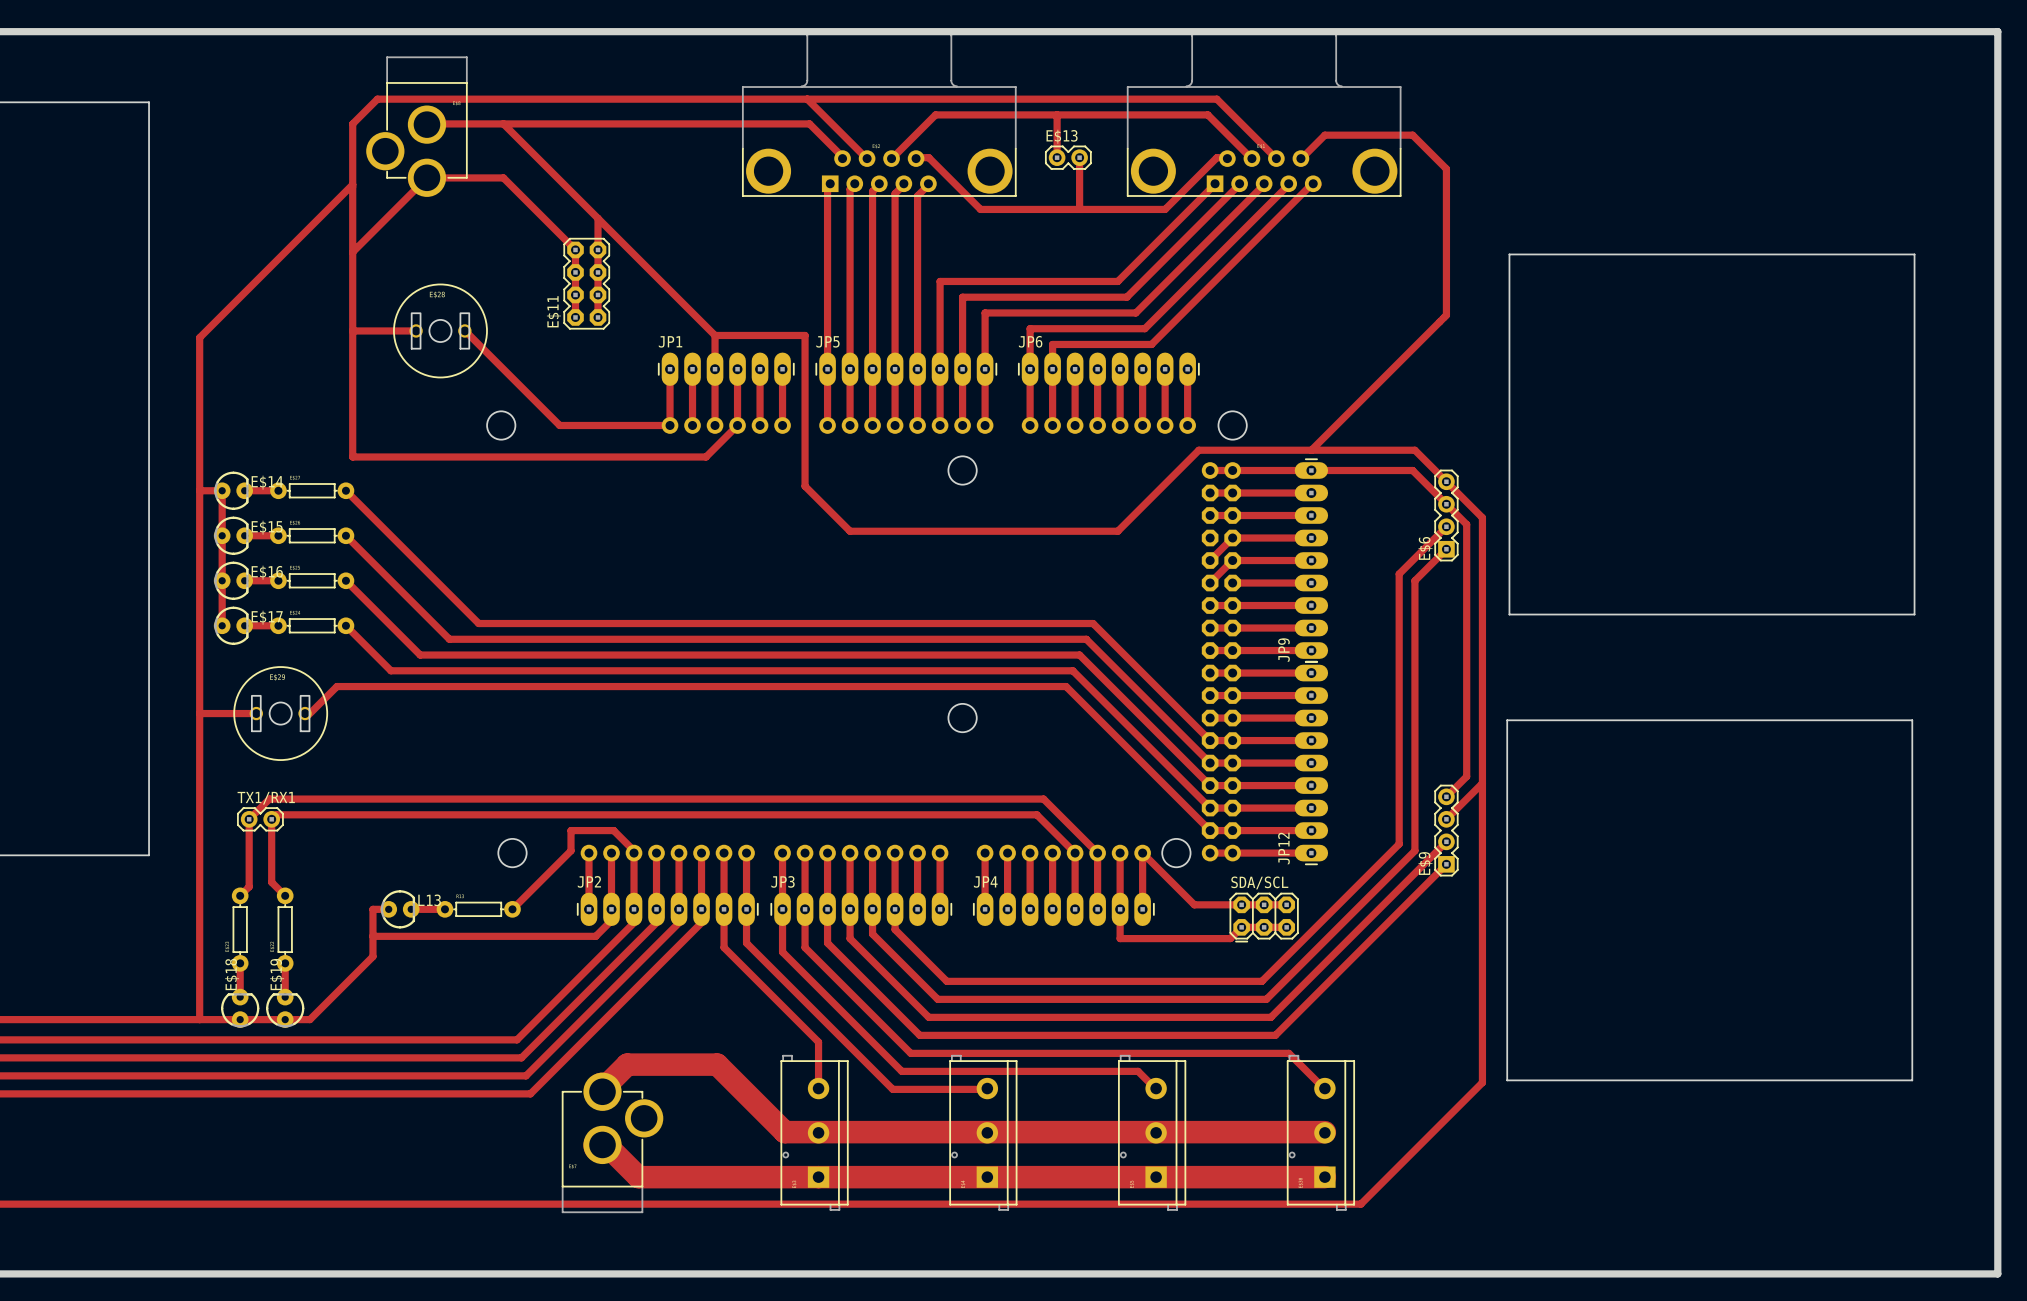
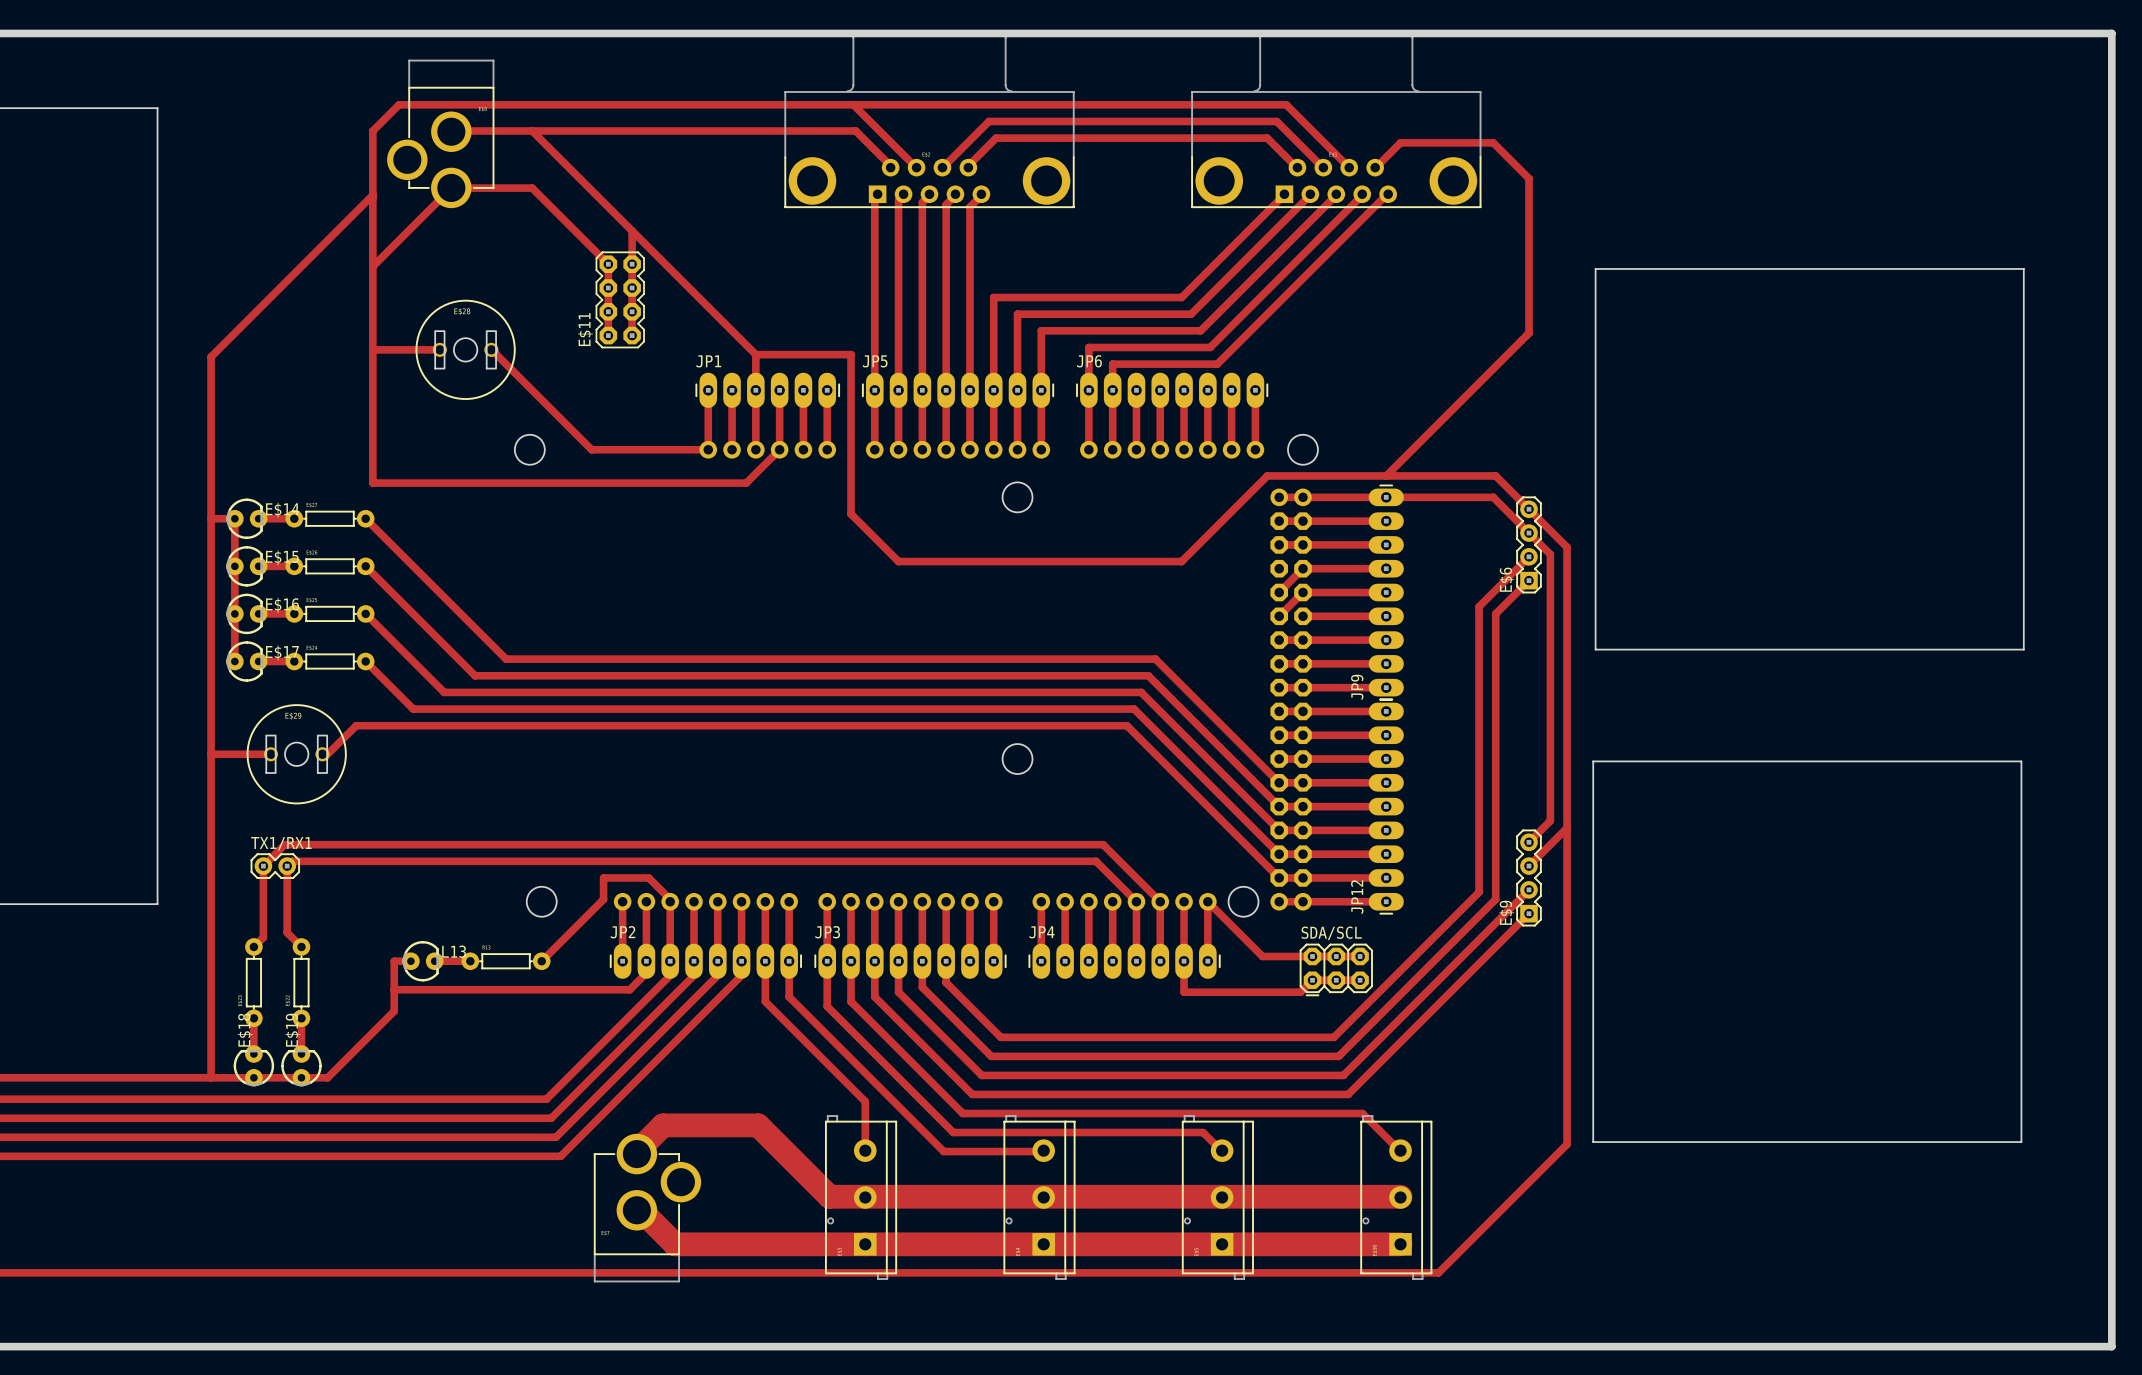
top track: (1057, 114) (1057, 157) -> none
top track: (915, 157) (928, 157) (980, 209) (1165, 209) (1216, 157) (1225, 157) -> (967, 166) (996, 138) (1267, 138) (1298, 169)
E$13: (1068, 157) -> none
top track: (1079, 157) (1079, 209) -> none

